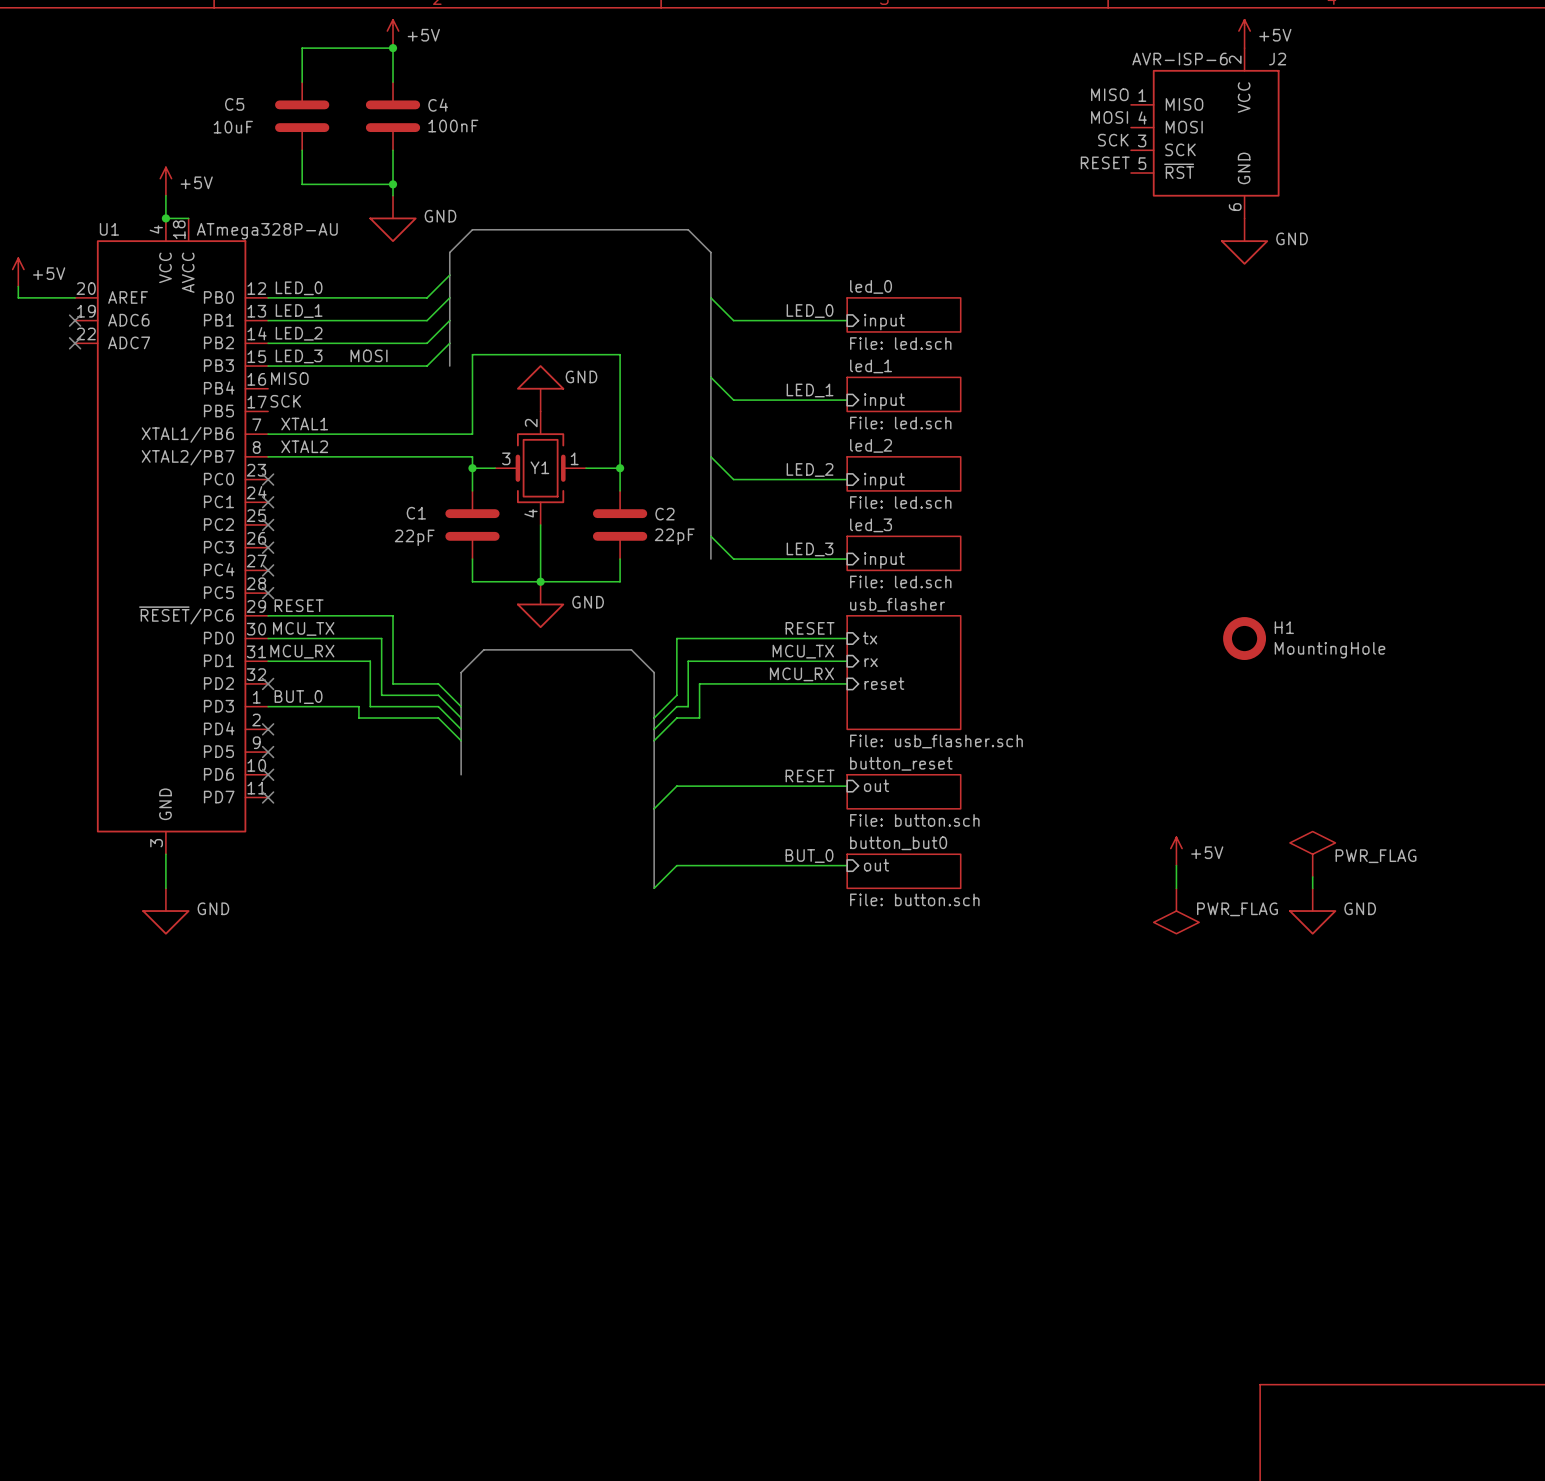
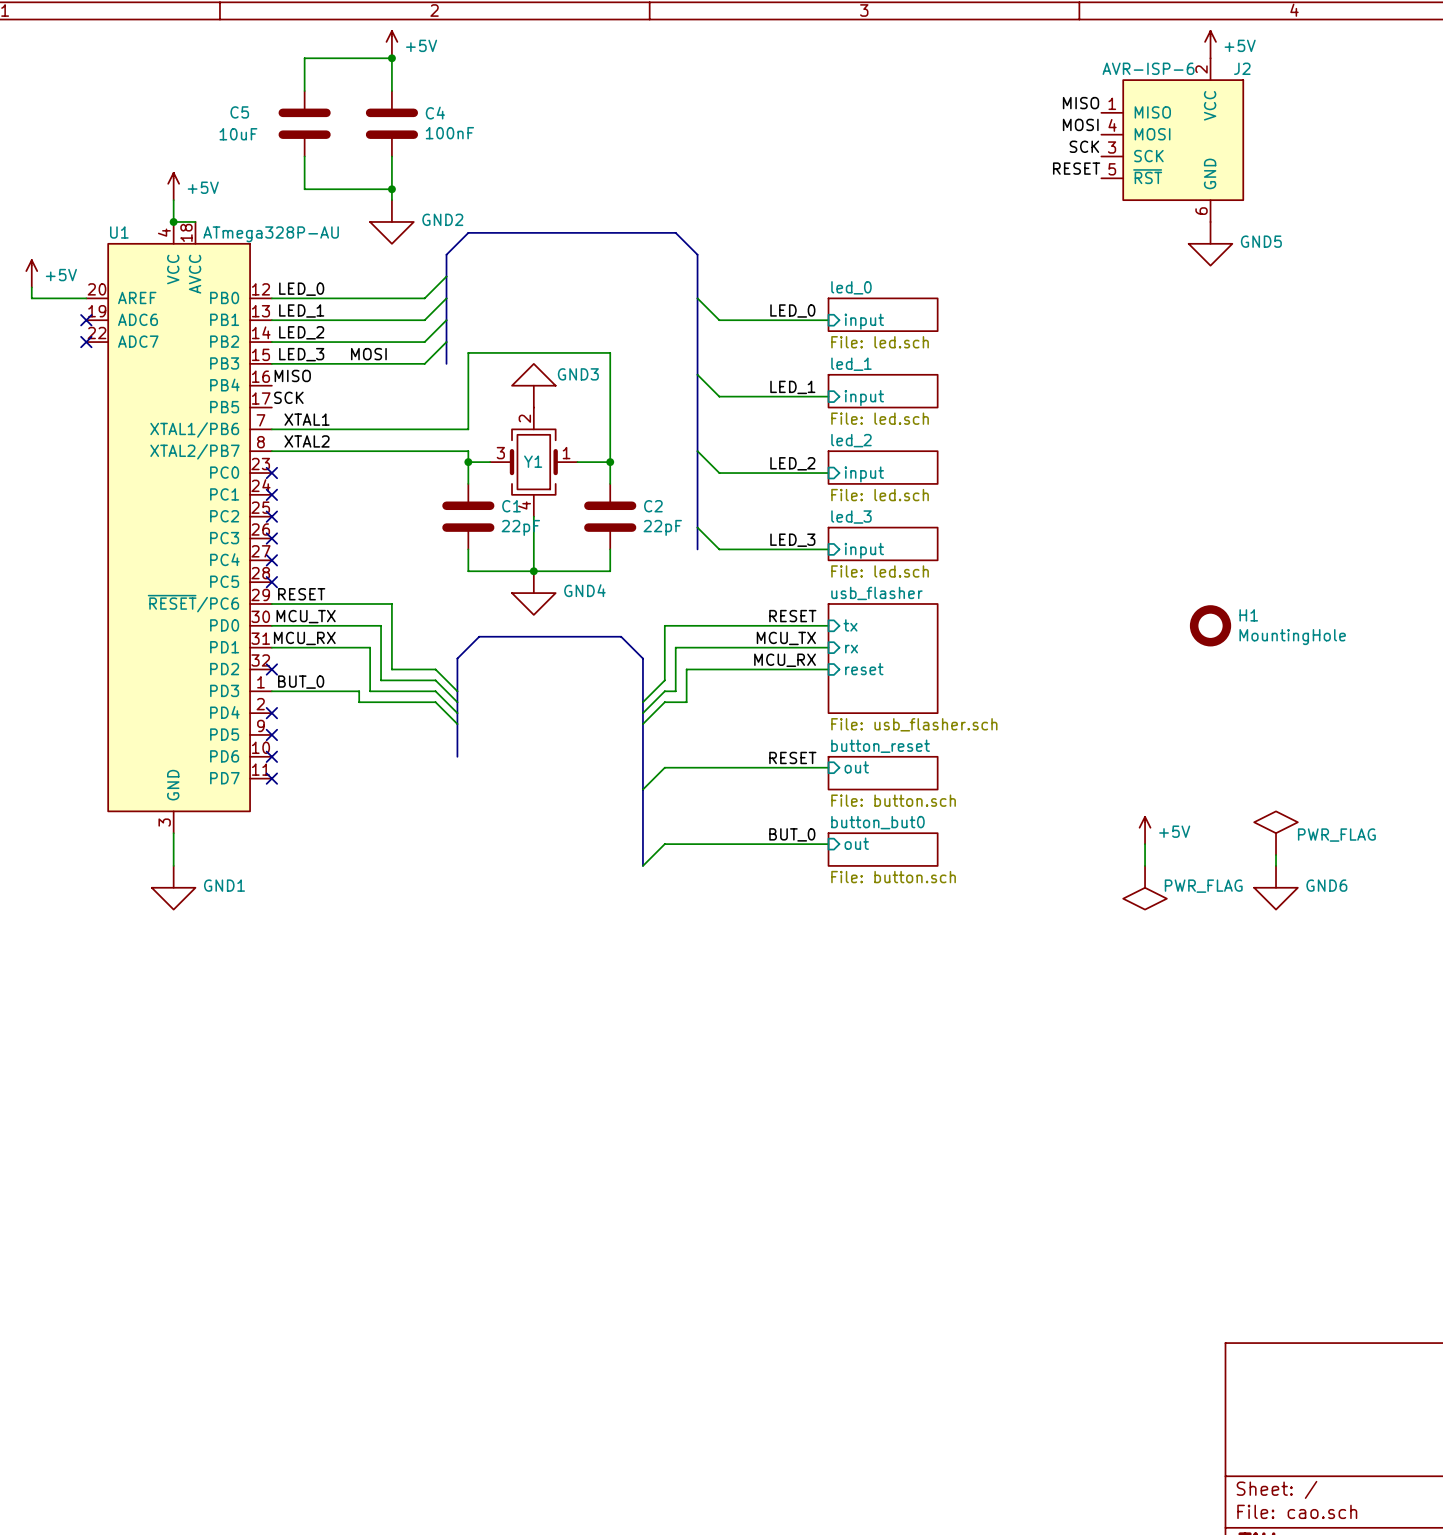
GND name: GND (440, 216) -> GND2 (442, 219)
GND name: GND (1292, 238) -> GND5 (1261, 241)
GND name: GND (581, 376) -> GND3 (578, 374)
C1 name position: C1 (416, 513) -> C1 (511, 506)
C1 value position: 22pF (414, 537) -> 22pF (520, 527)
GND name: GND (588, 602) -> GND4 (584, 590)
GND name: GND (213, 908) -> GND1 (224, 885)
GND name: GND (1360, 908) -> GND6 (1326, 885)

